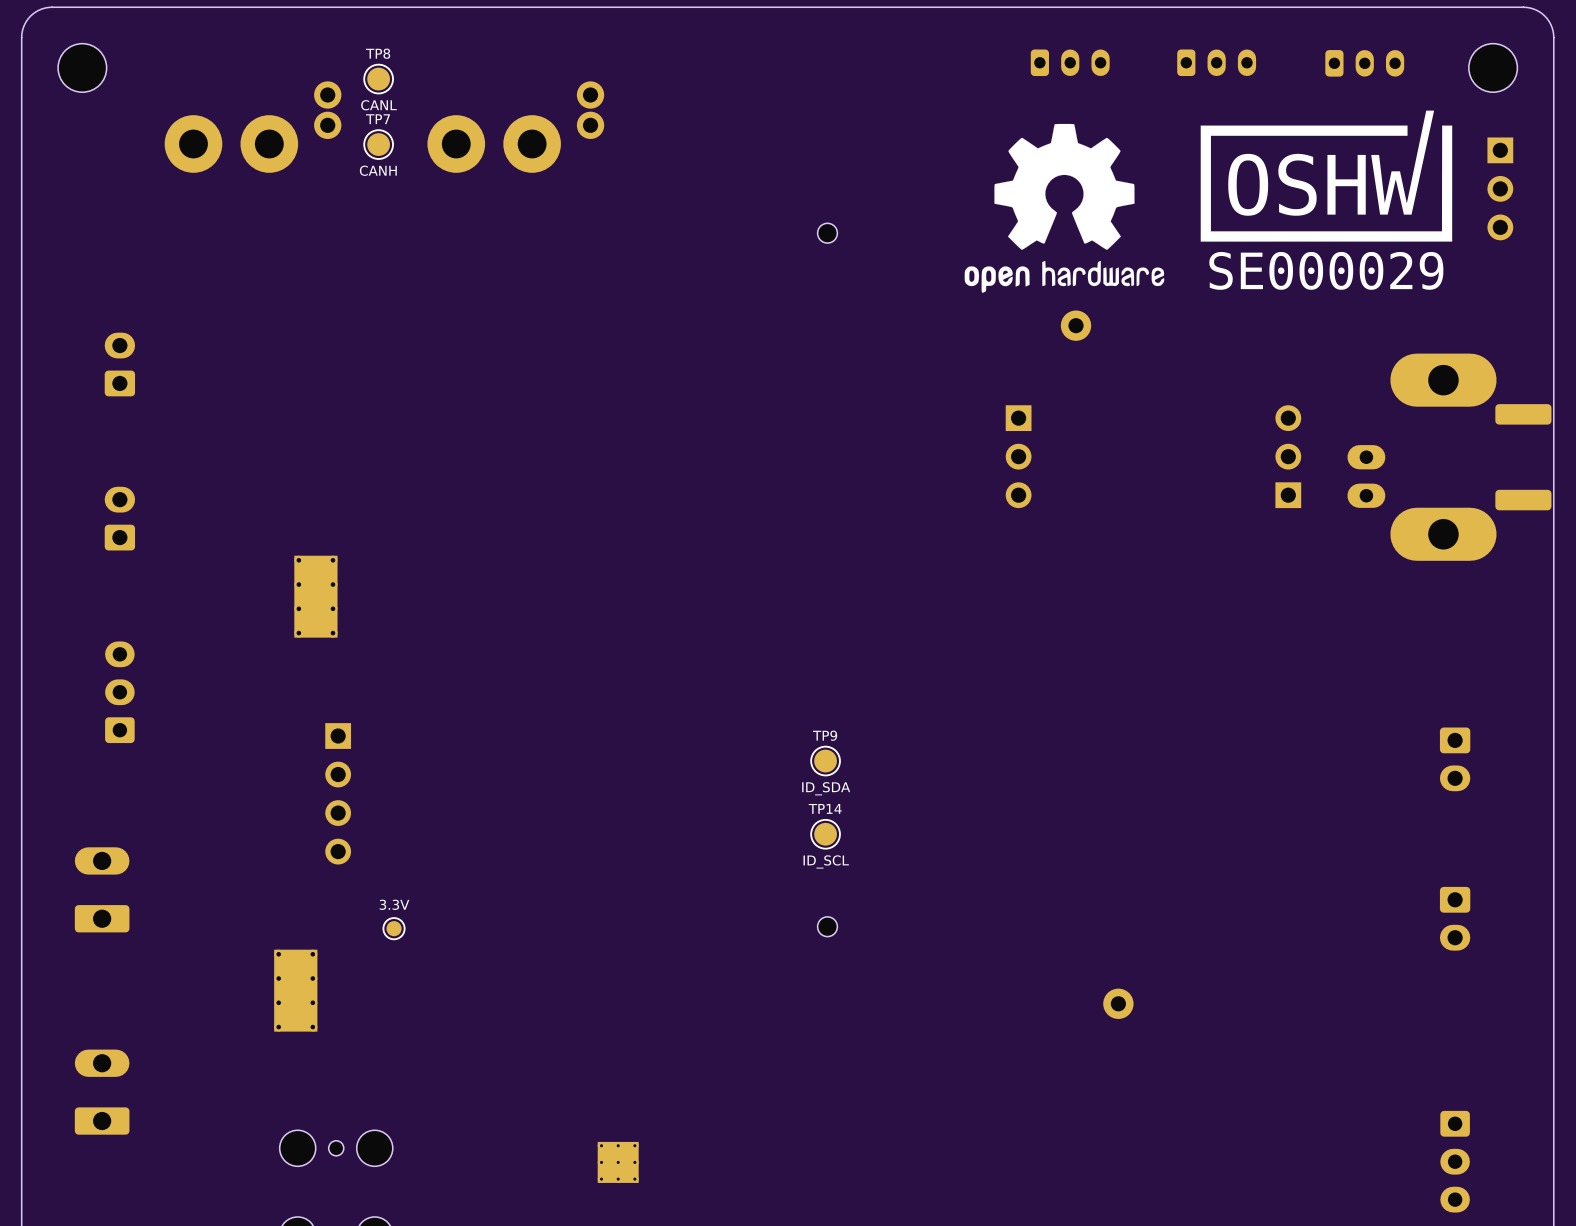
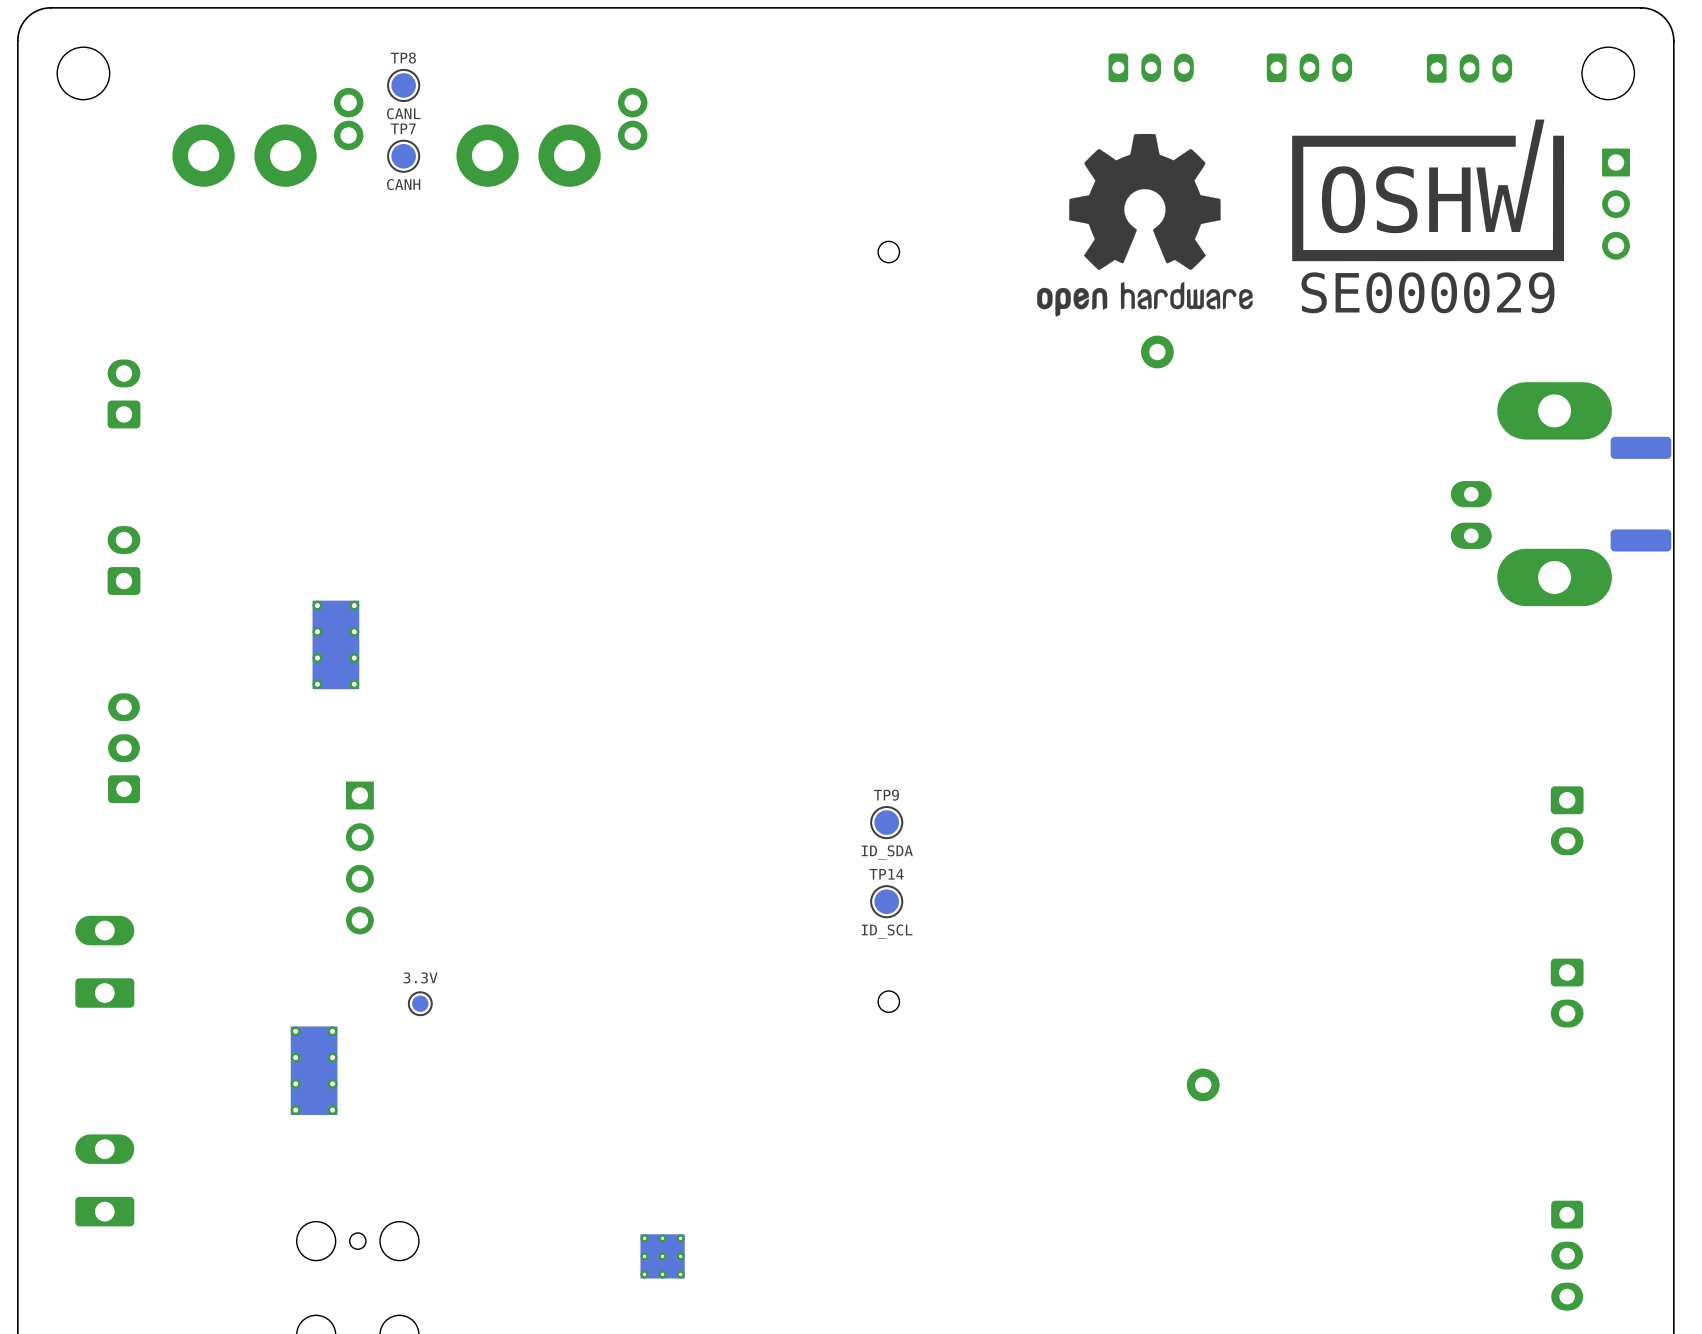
part: (1018, 456) -> none
part: (1288, 456) -> none

